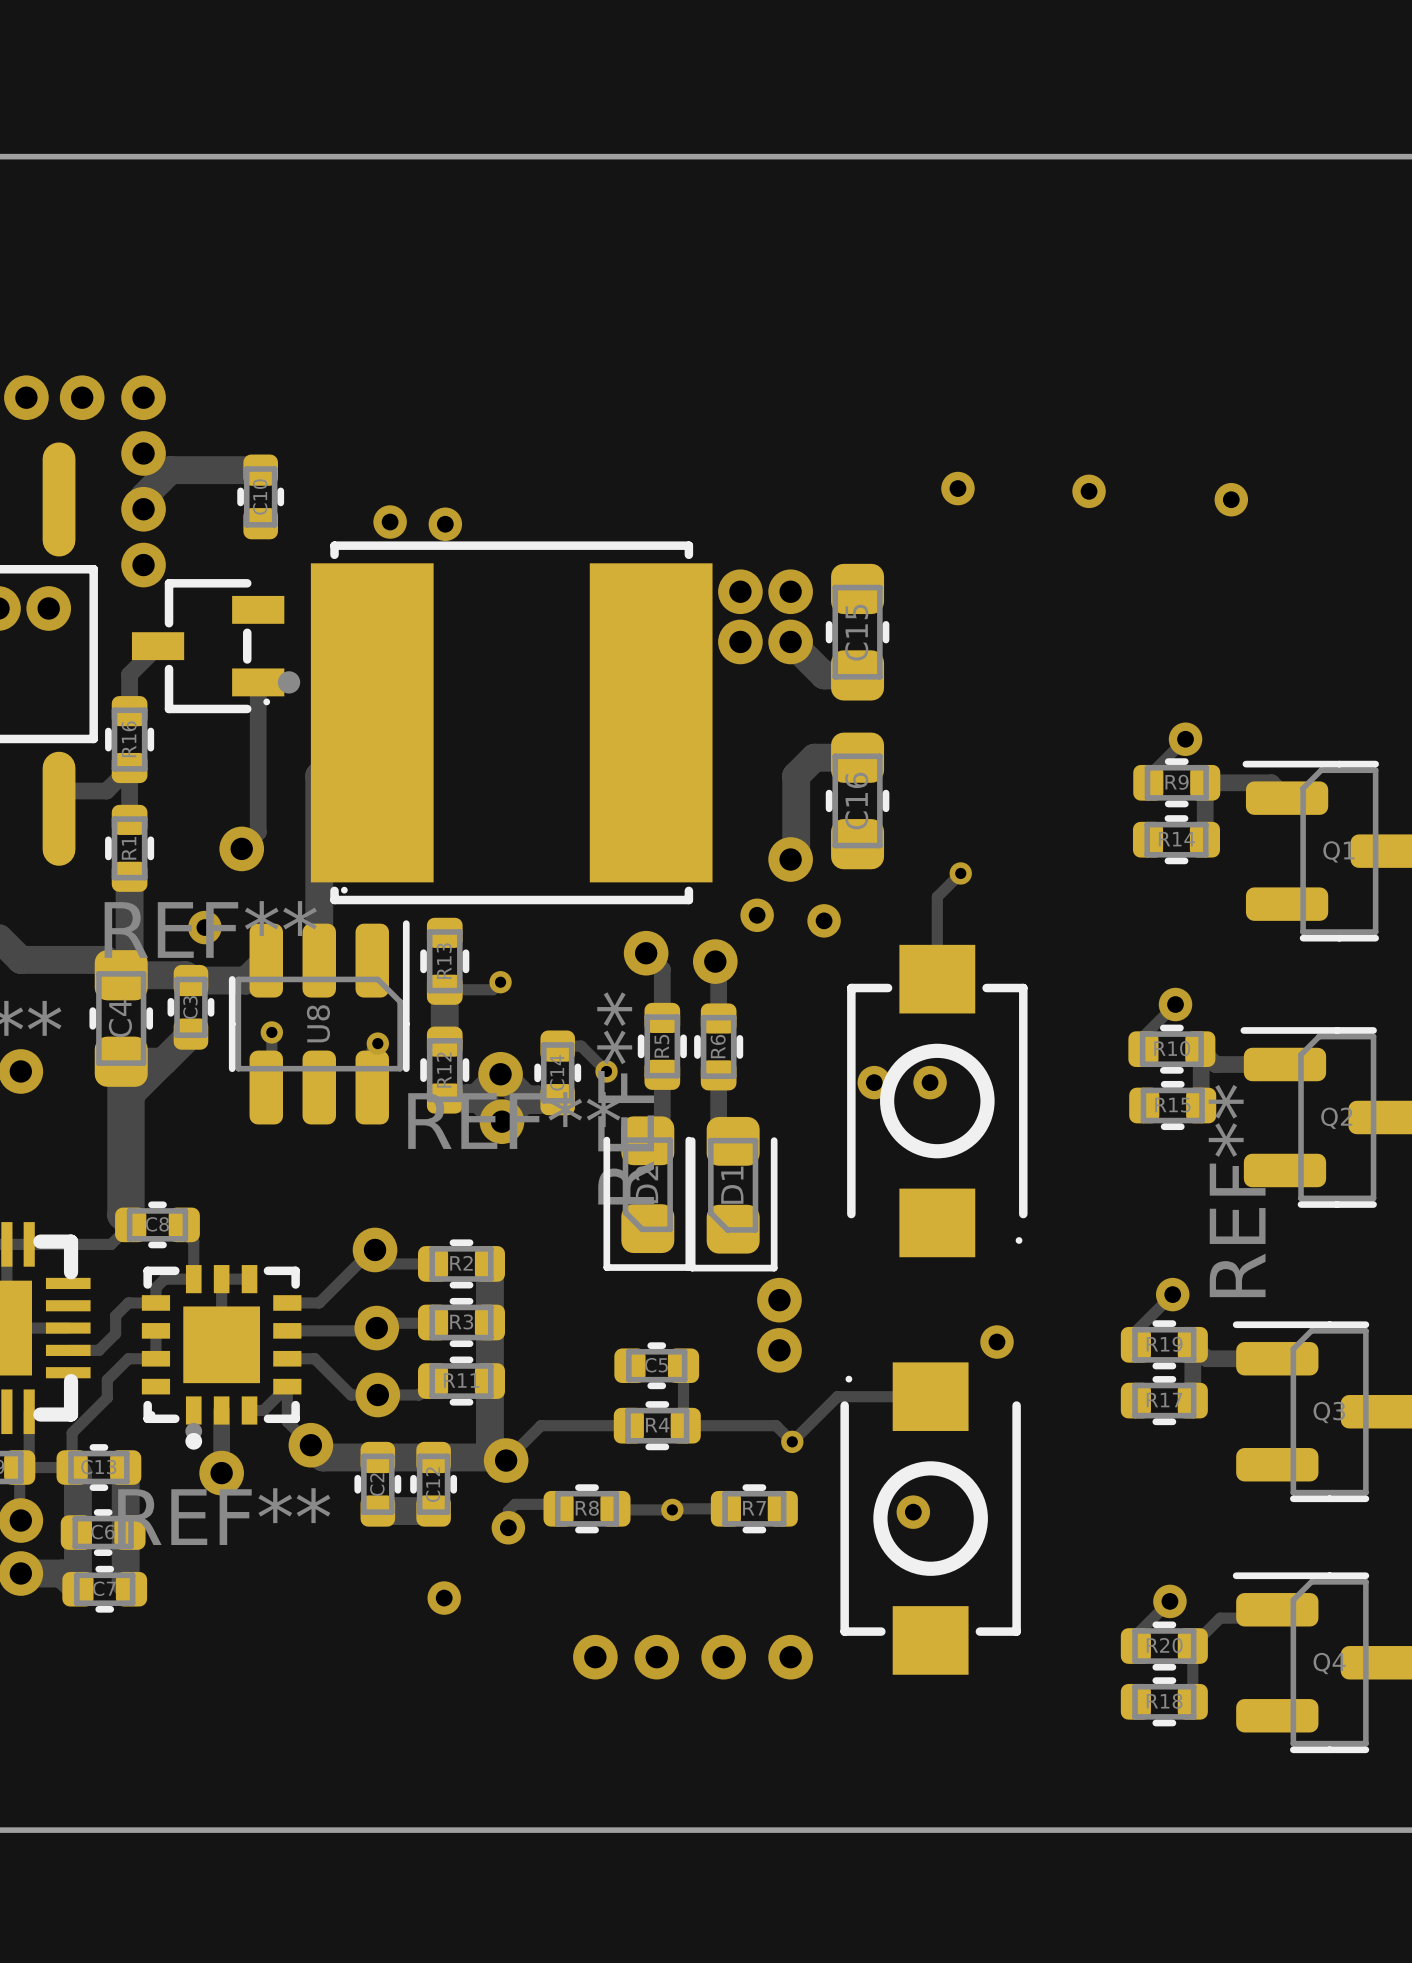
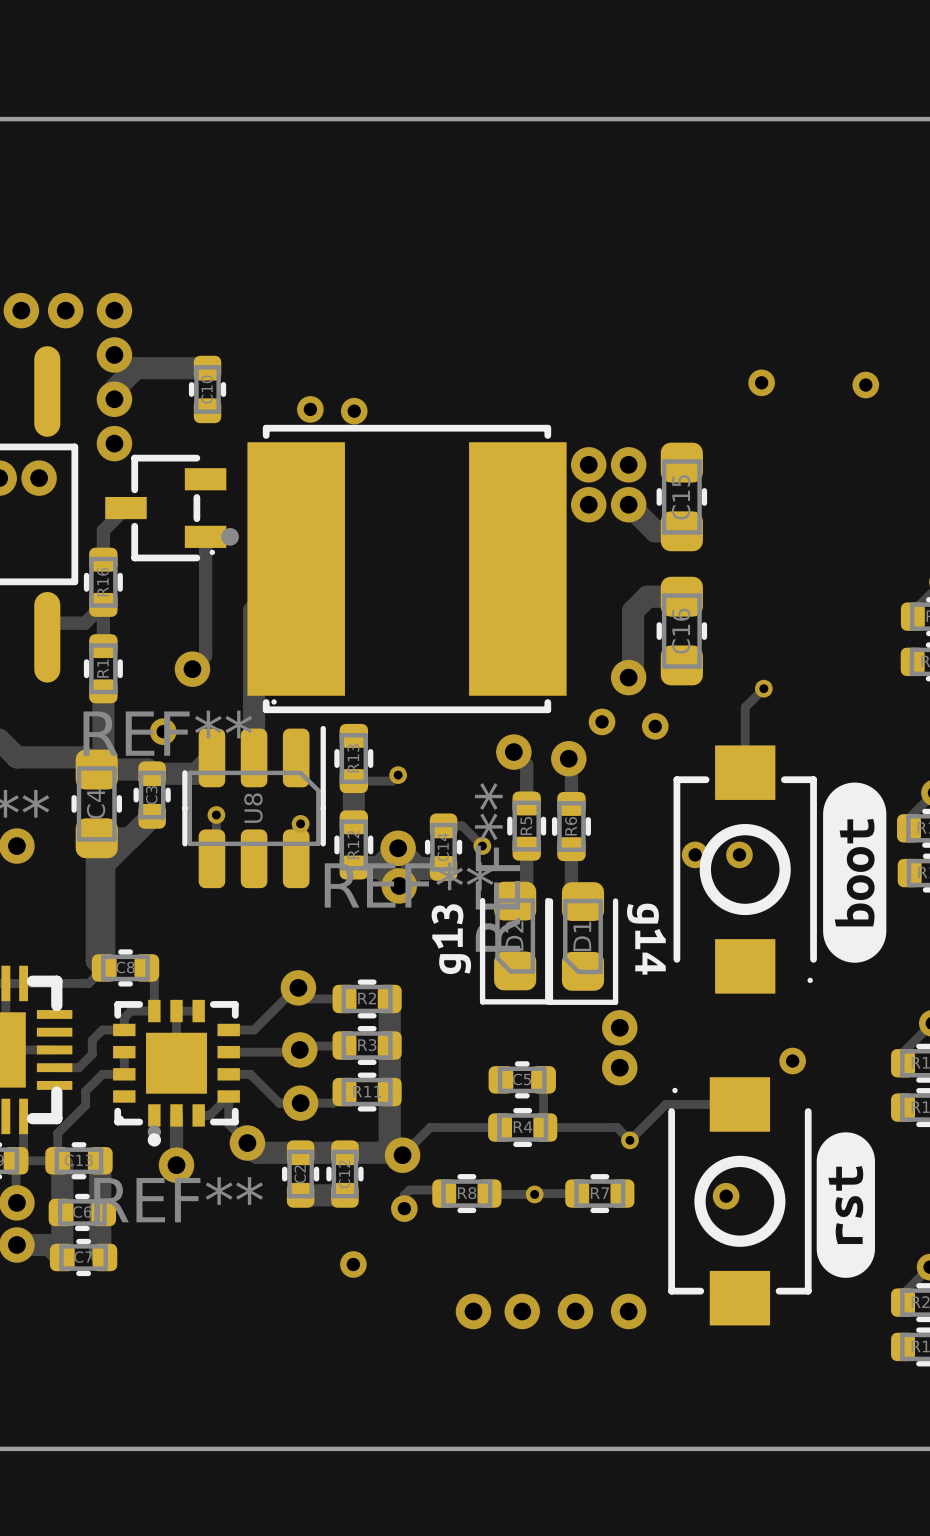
drawing: none -> [823, 782, 887, 963]
drawing: none -> [626, 903, 666, 975]
drawing: none -> [431, 904, 472, 975]
drawing: none -> [816, 1132, 876, 1278]

